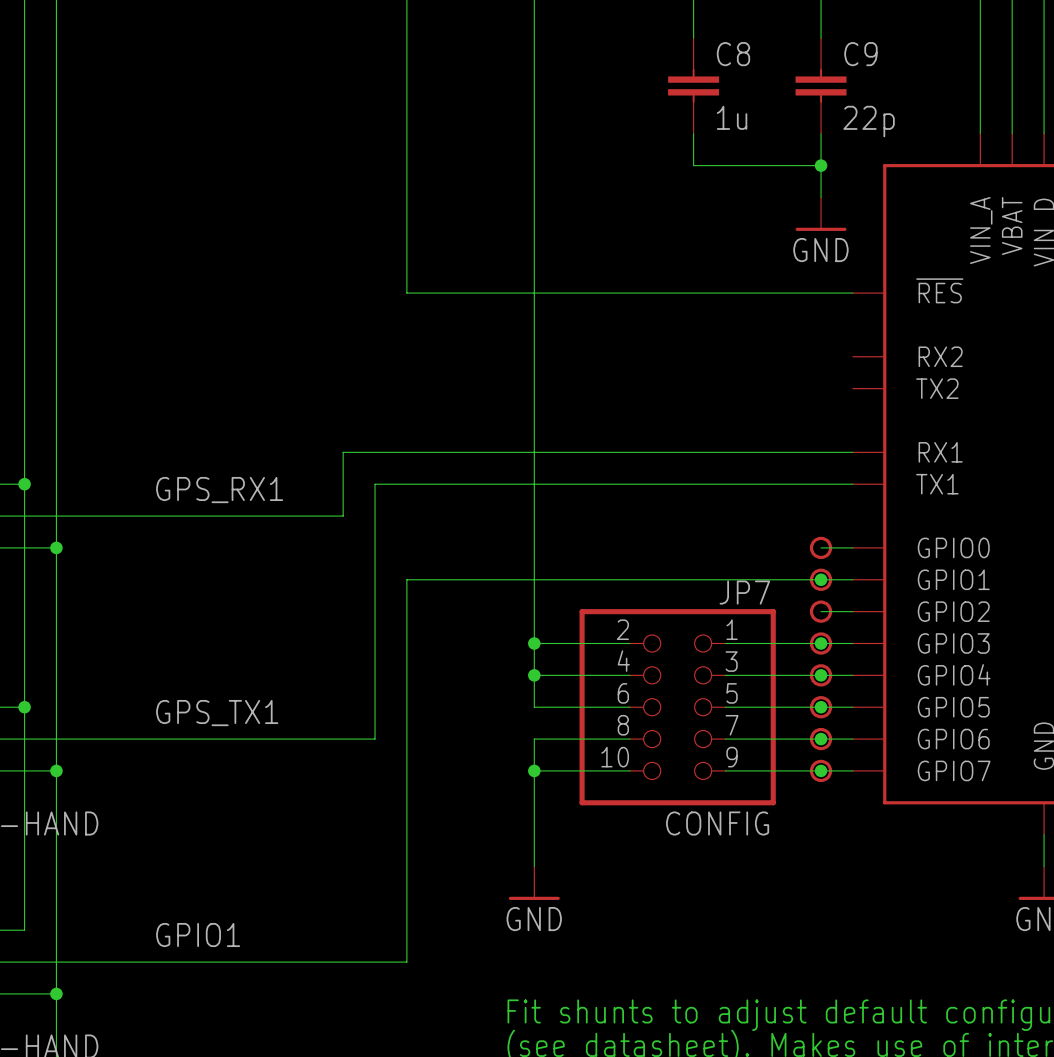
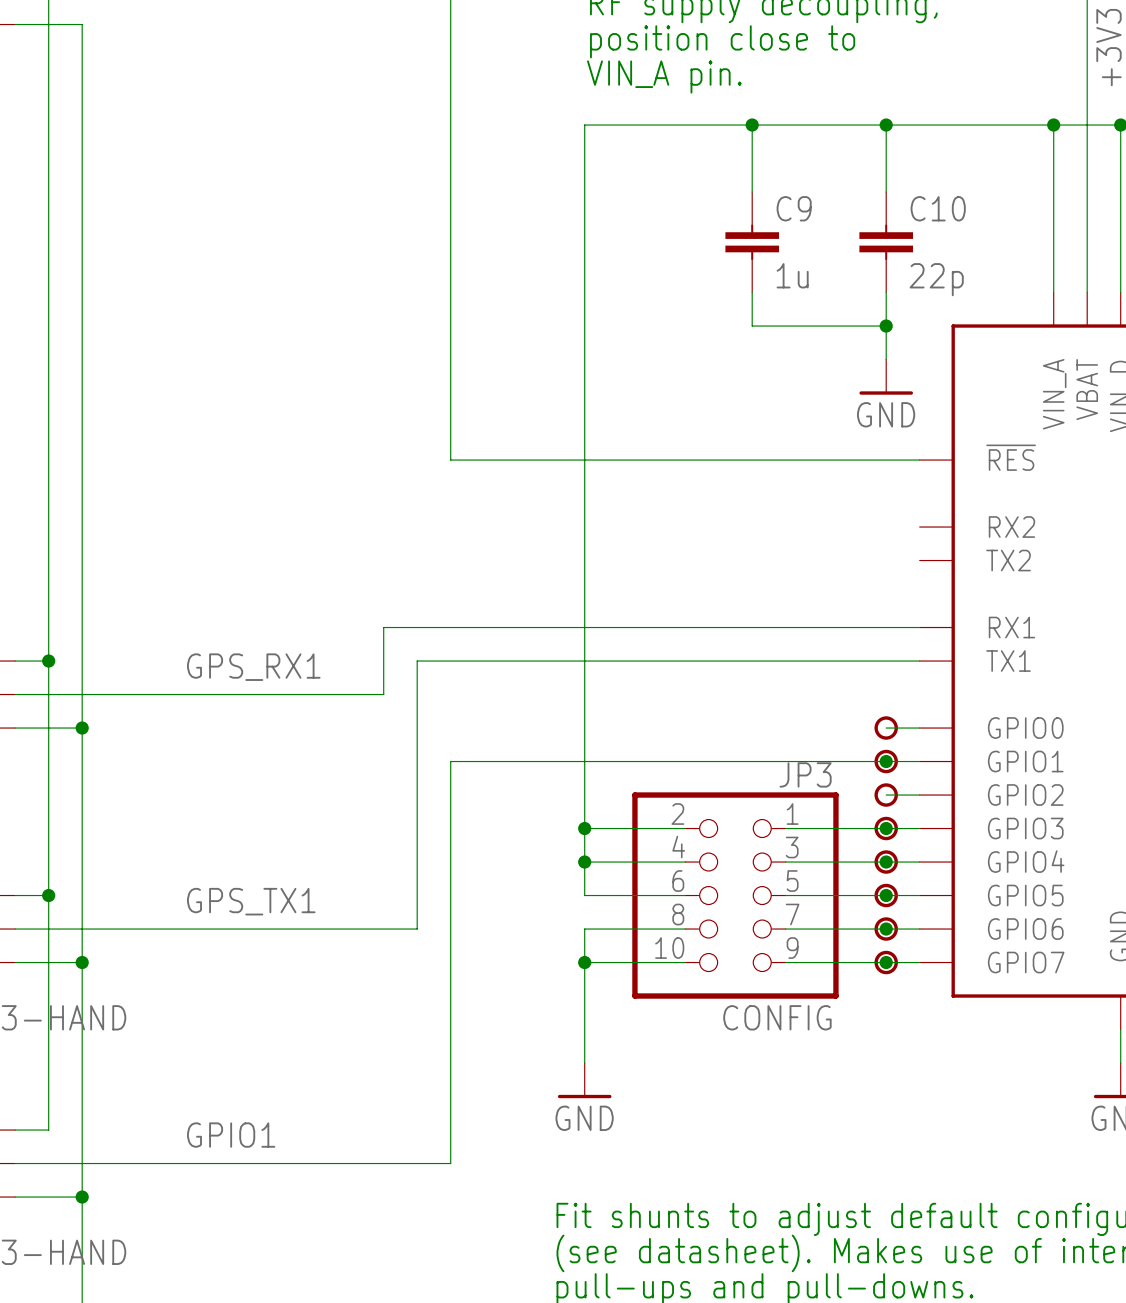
C8 name: C8 (733, 54) -> C9 (794, 208)
C9 name: C9 (860, 54) -> C10 (938, 208)
JP7 name: JP7 (744, 592) -> JP3 (805, 774)

